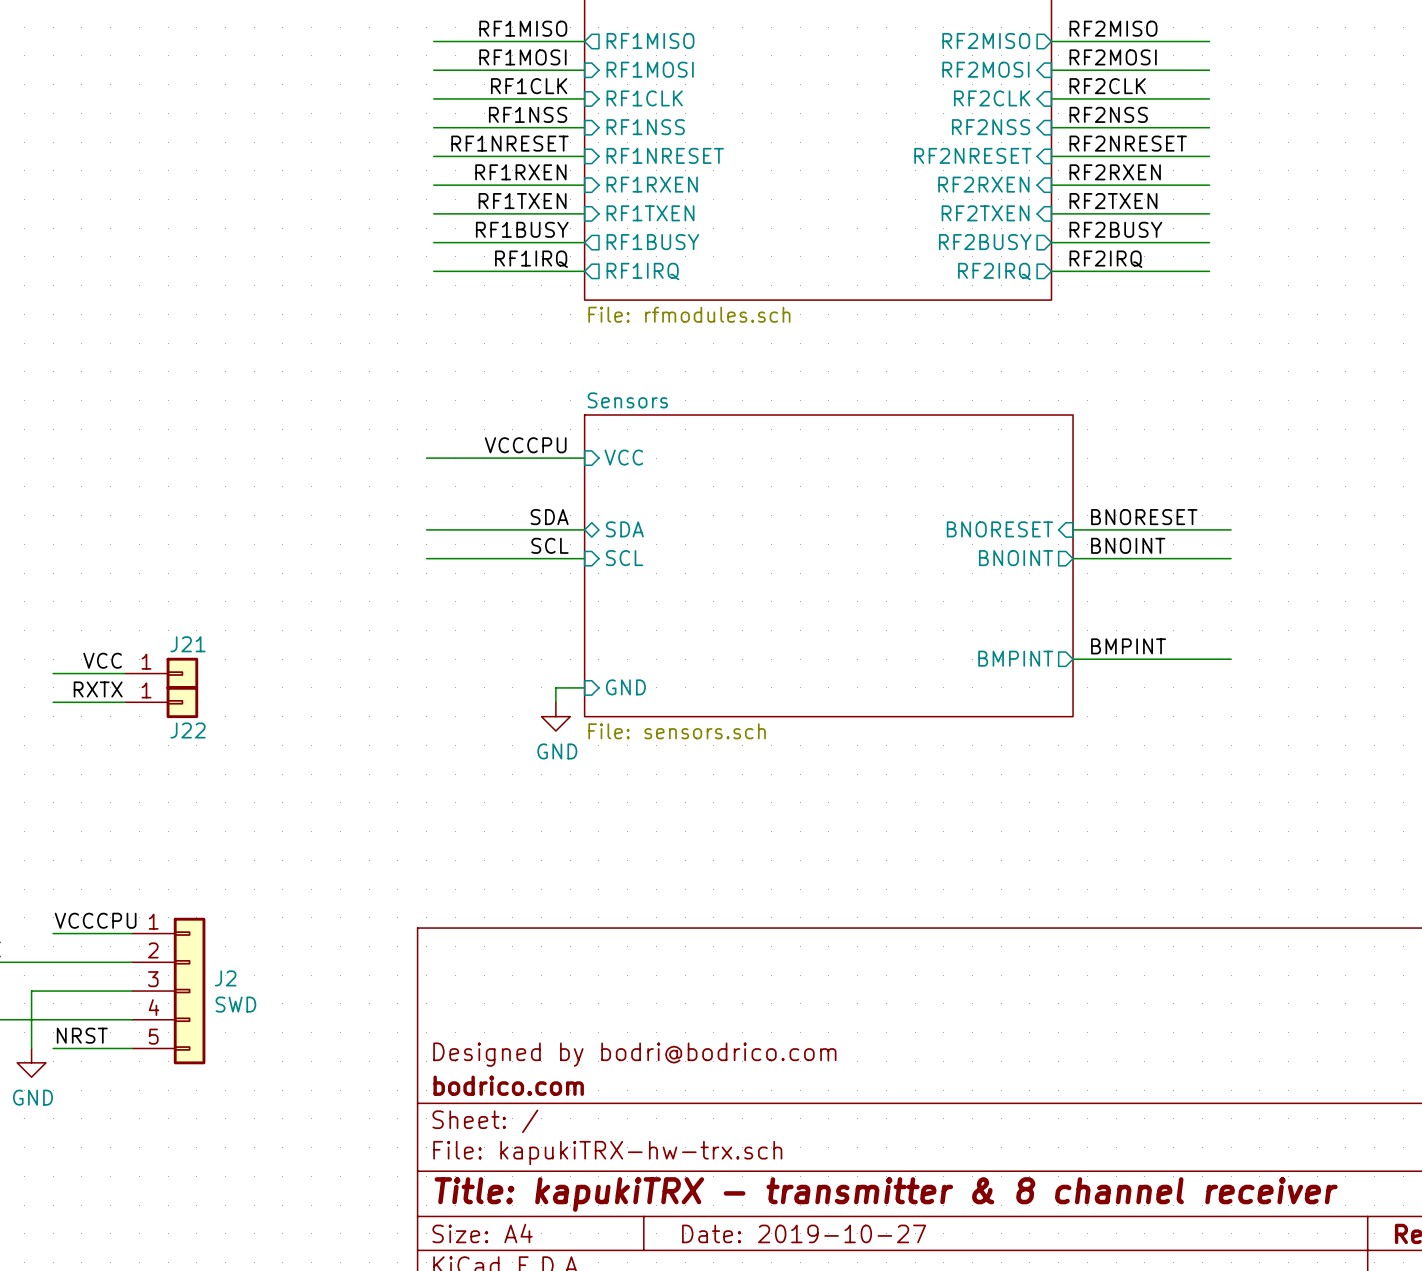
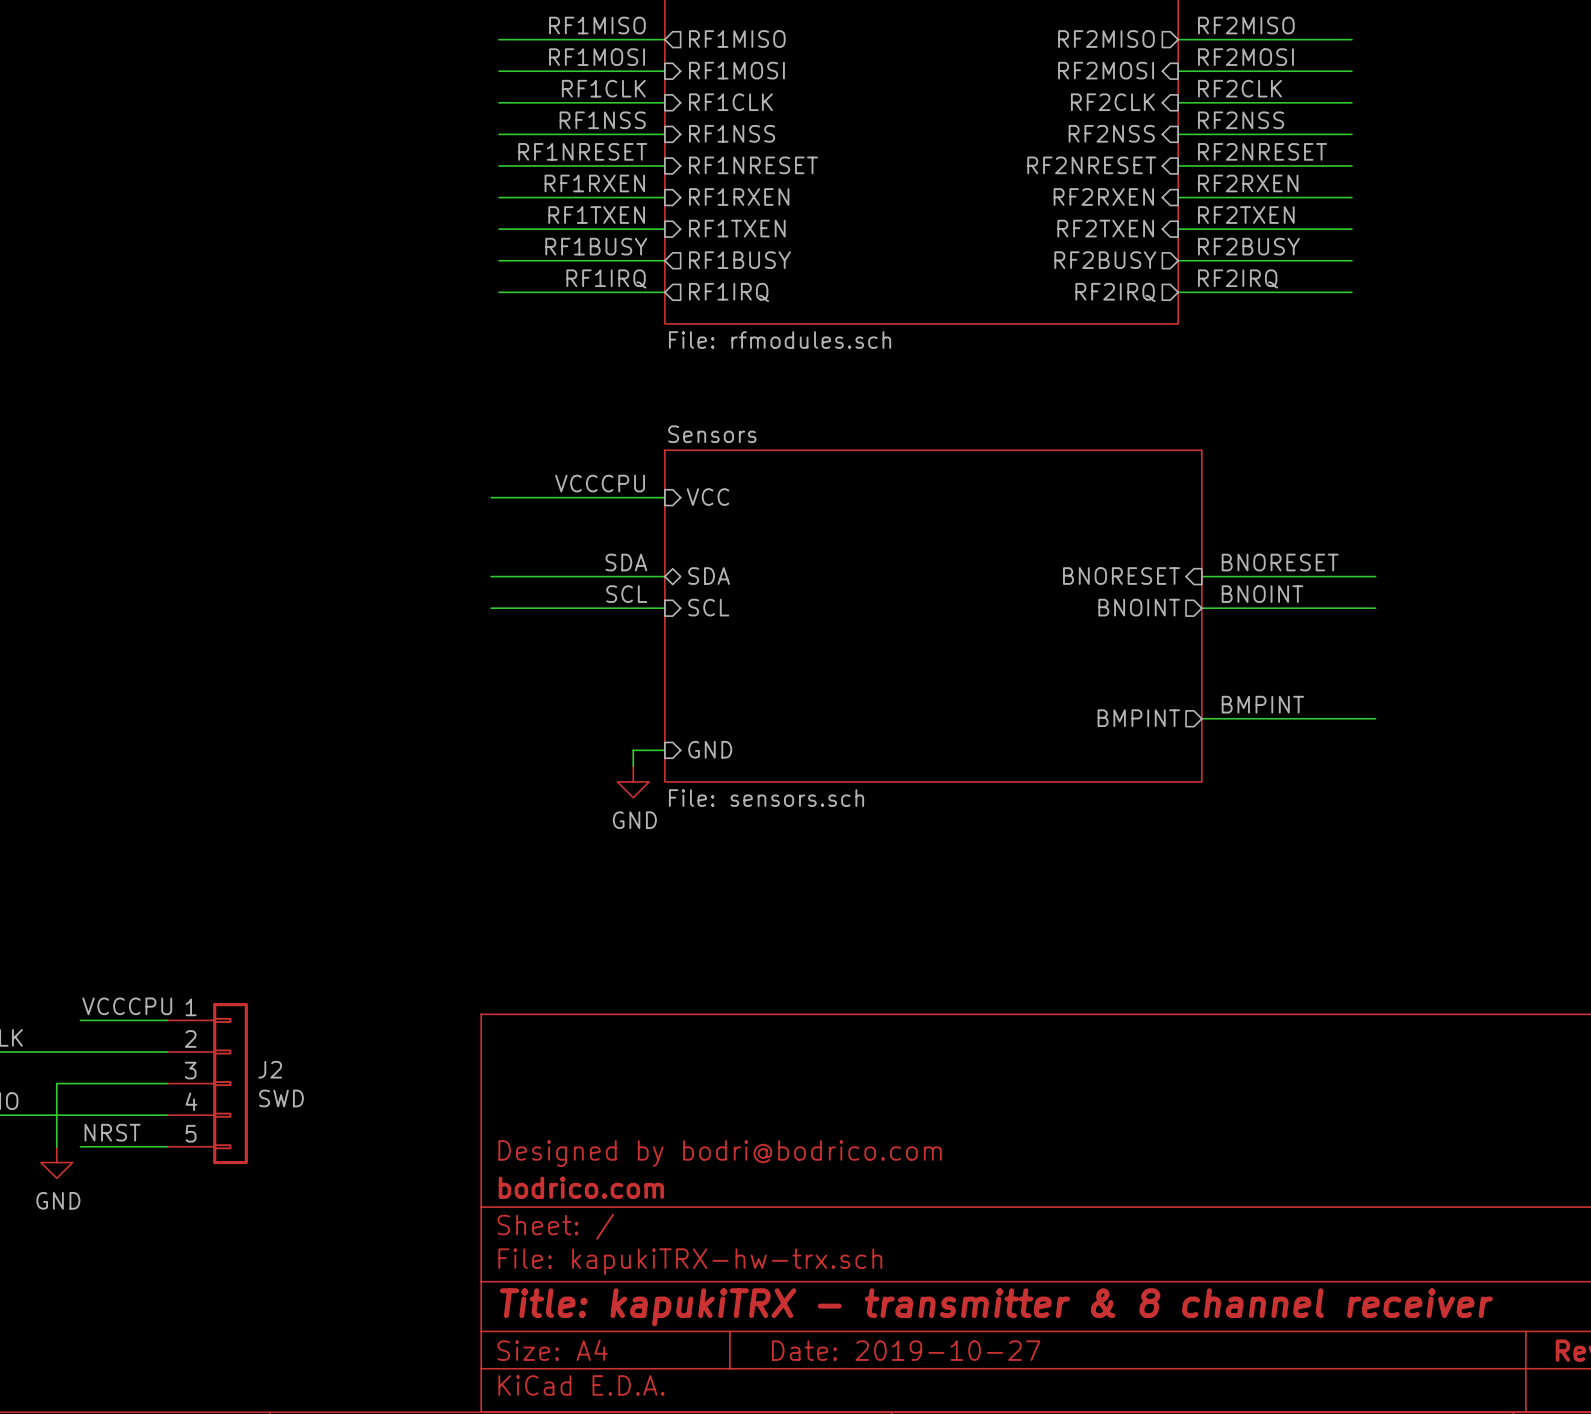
label: VCC (102, 660) -> none
wire: (53, 673) (124, 673) -> none
J21: (161, 673) -> none
label: RXTX (98, 689) -> none
wire: (53, 702) (124, 702) -> none
J22: (161, 702) -> none

